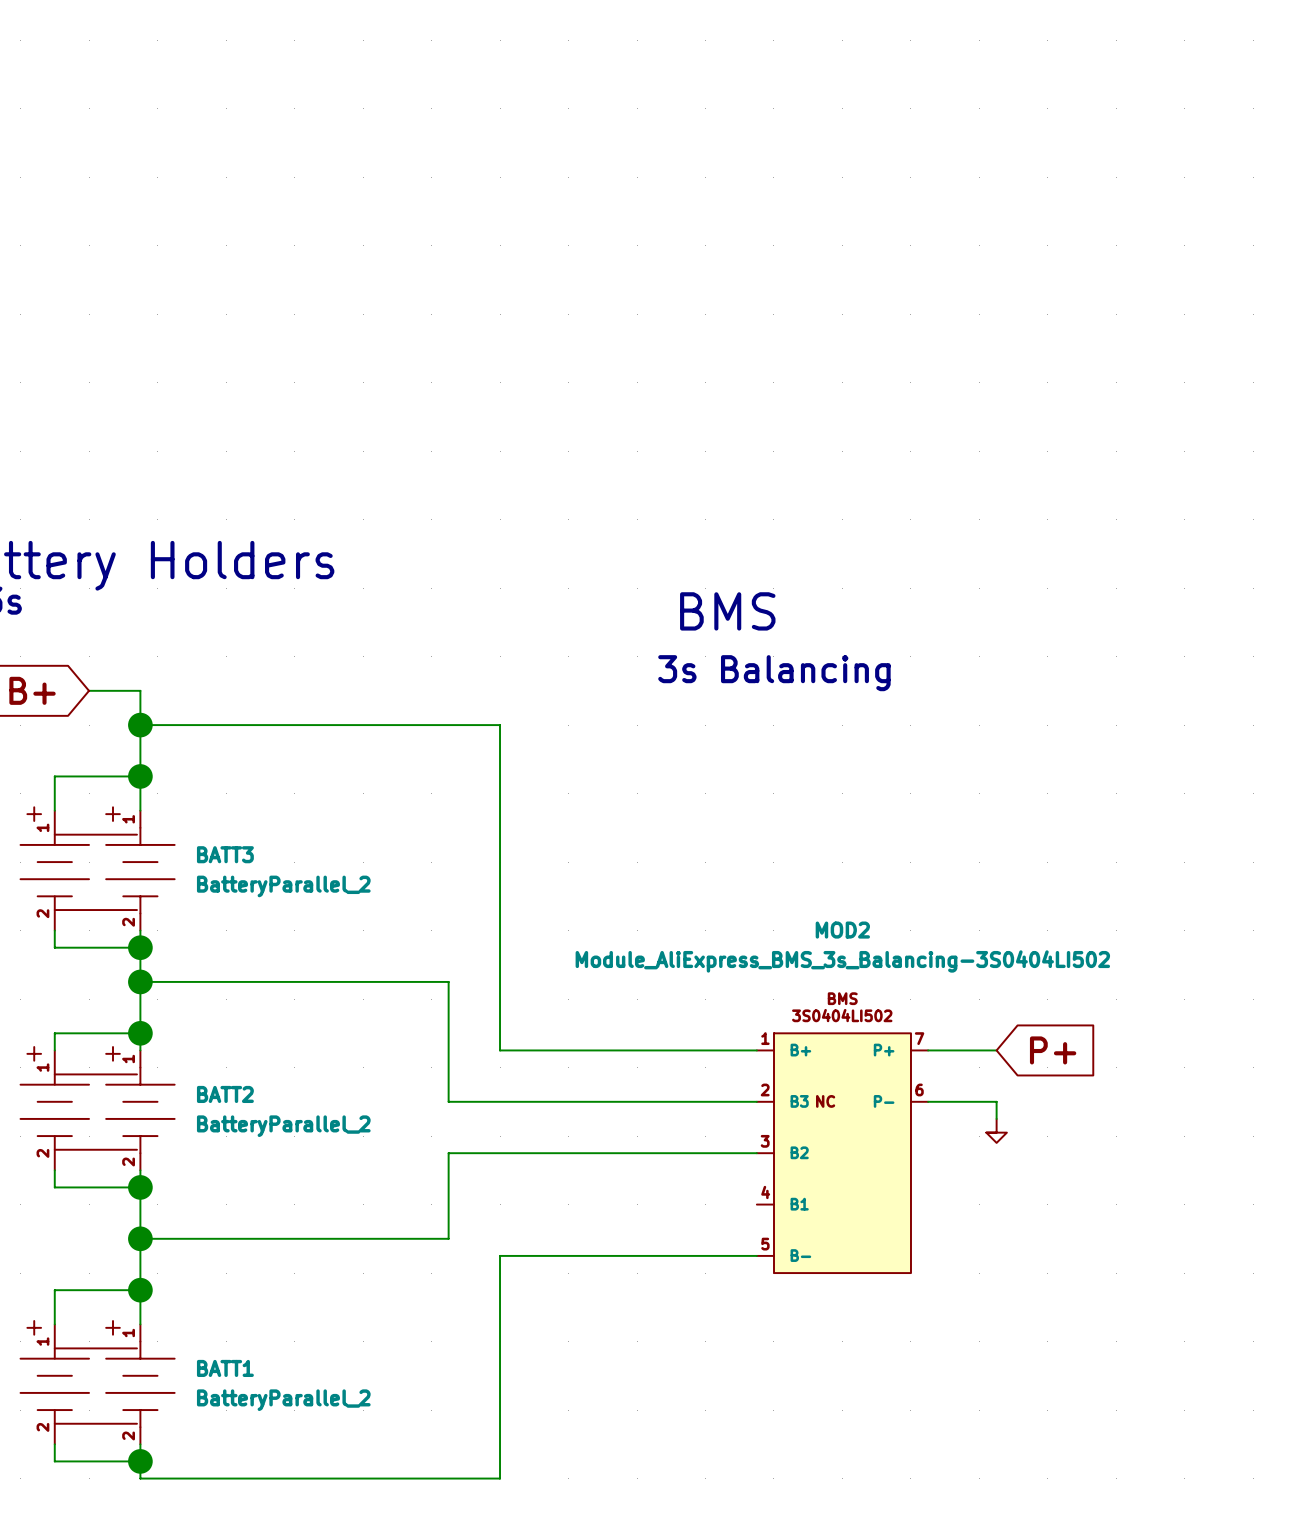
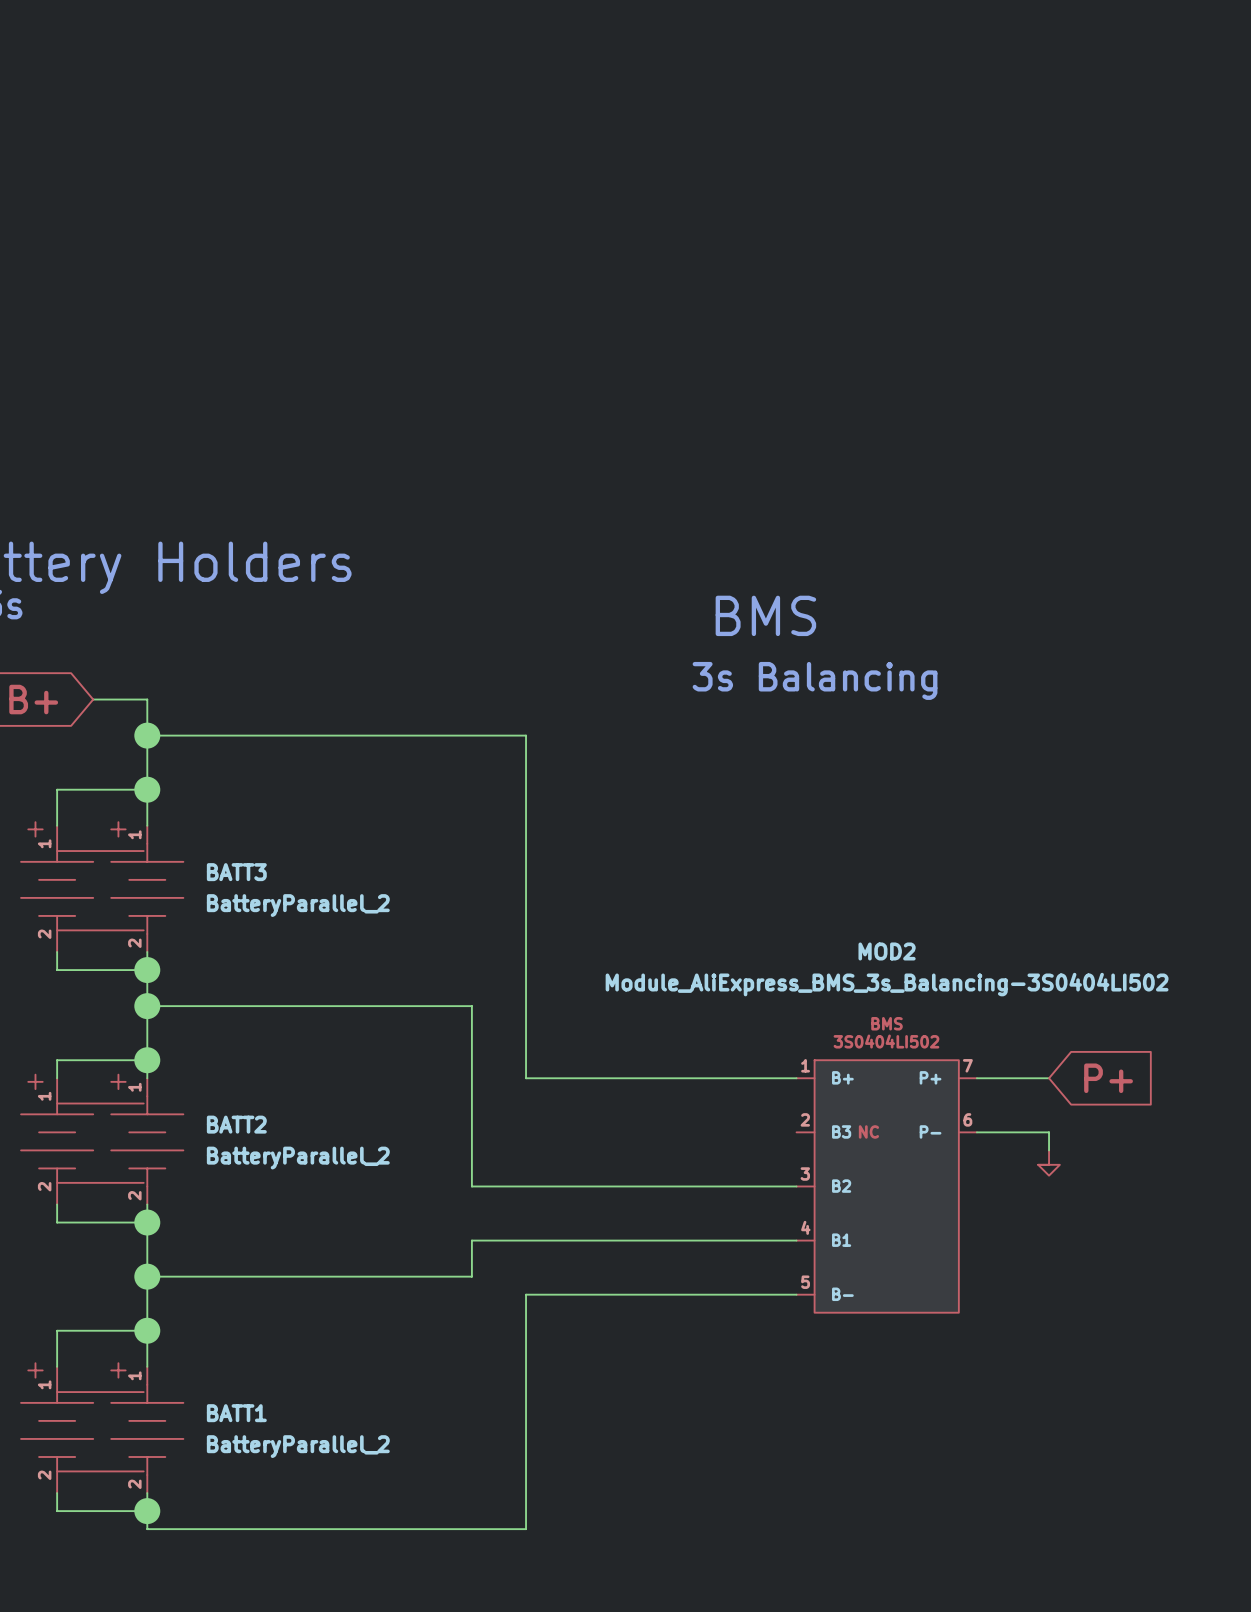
wire: (448, 1101) (756, 1101) -> (471, 1240) (796, 1240)
wire: (448, 1153) (448, 1204) -> (471, 1186) (471, 1132)

